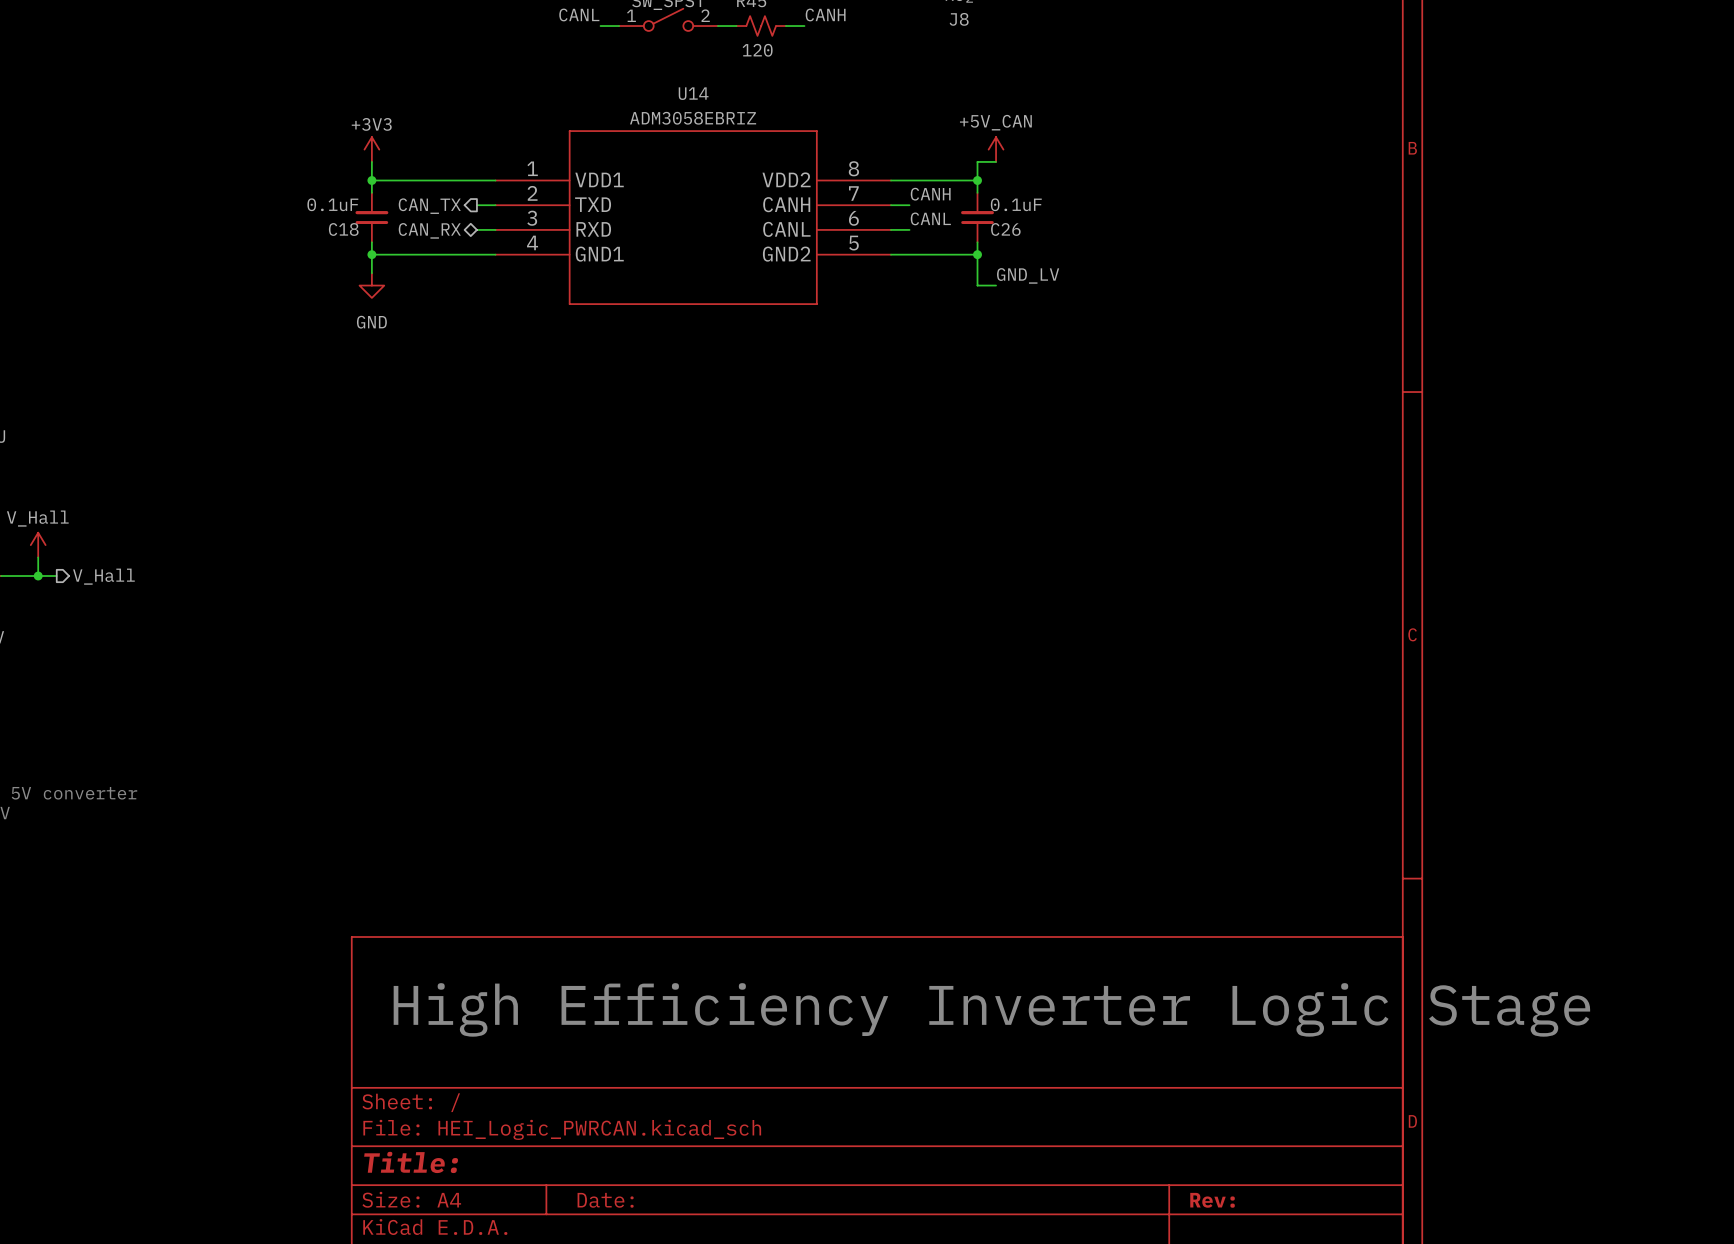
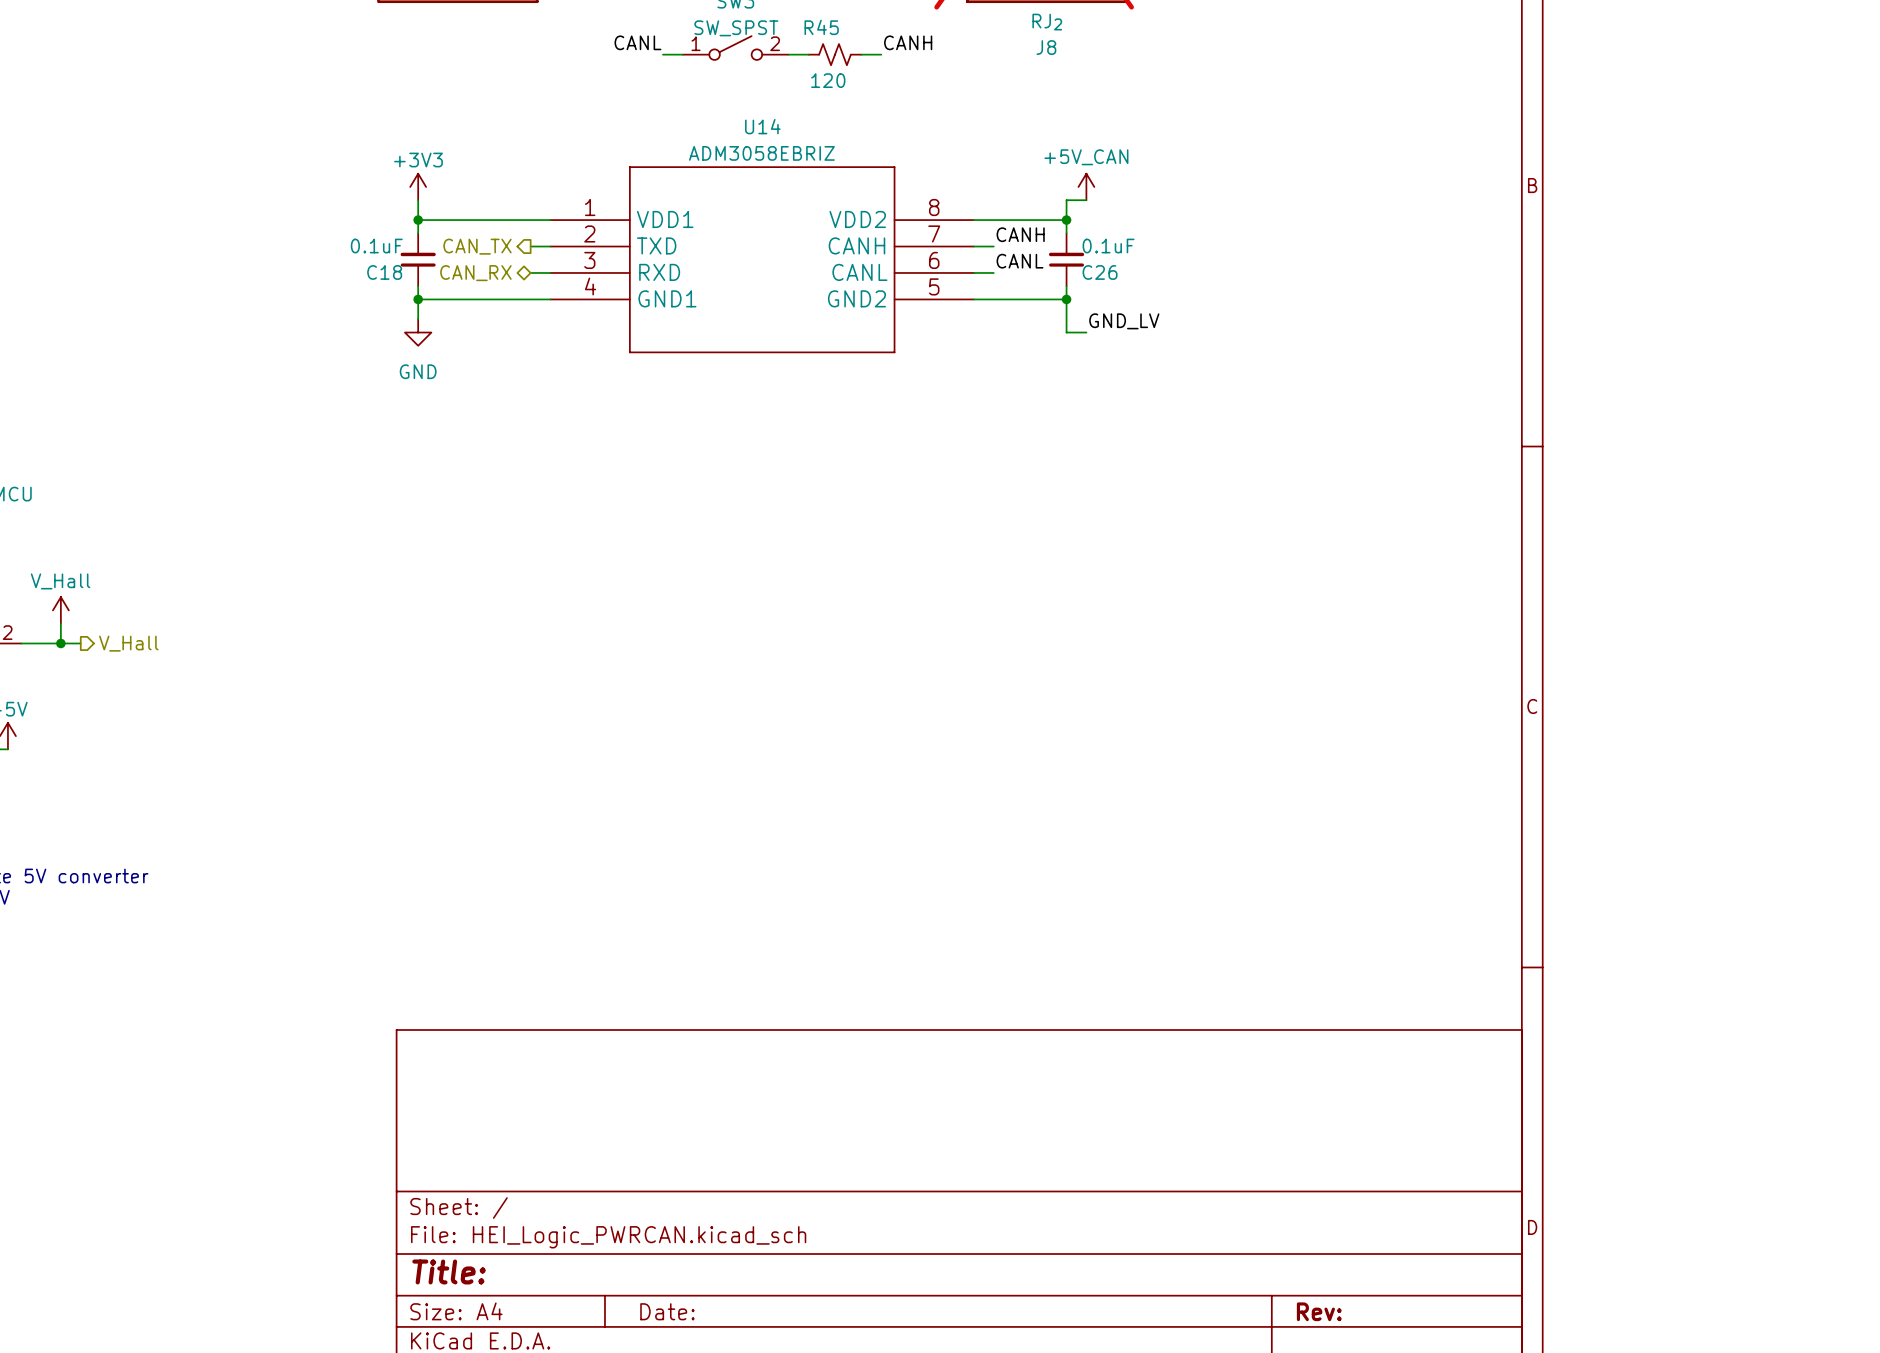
text: High Efficiency Inverter Logic Stage (991, 1009) -> none

